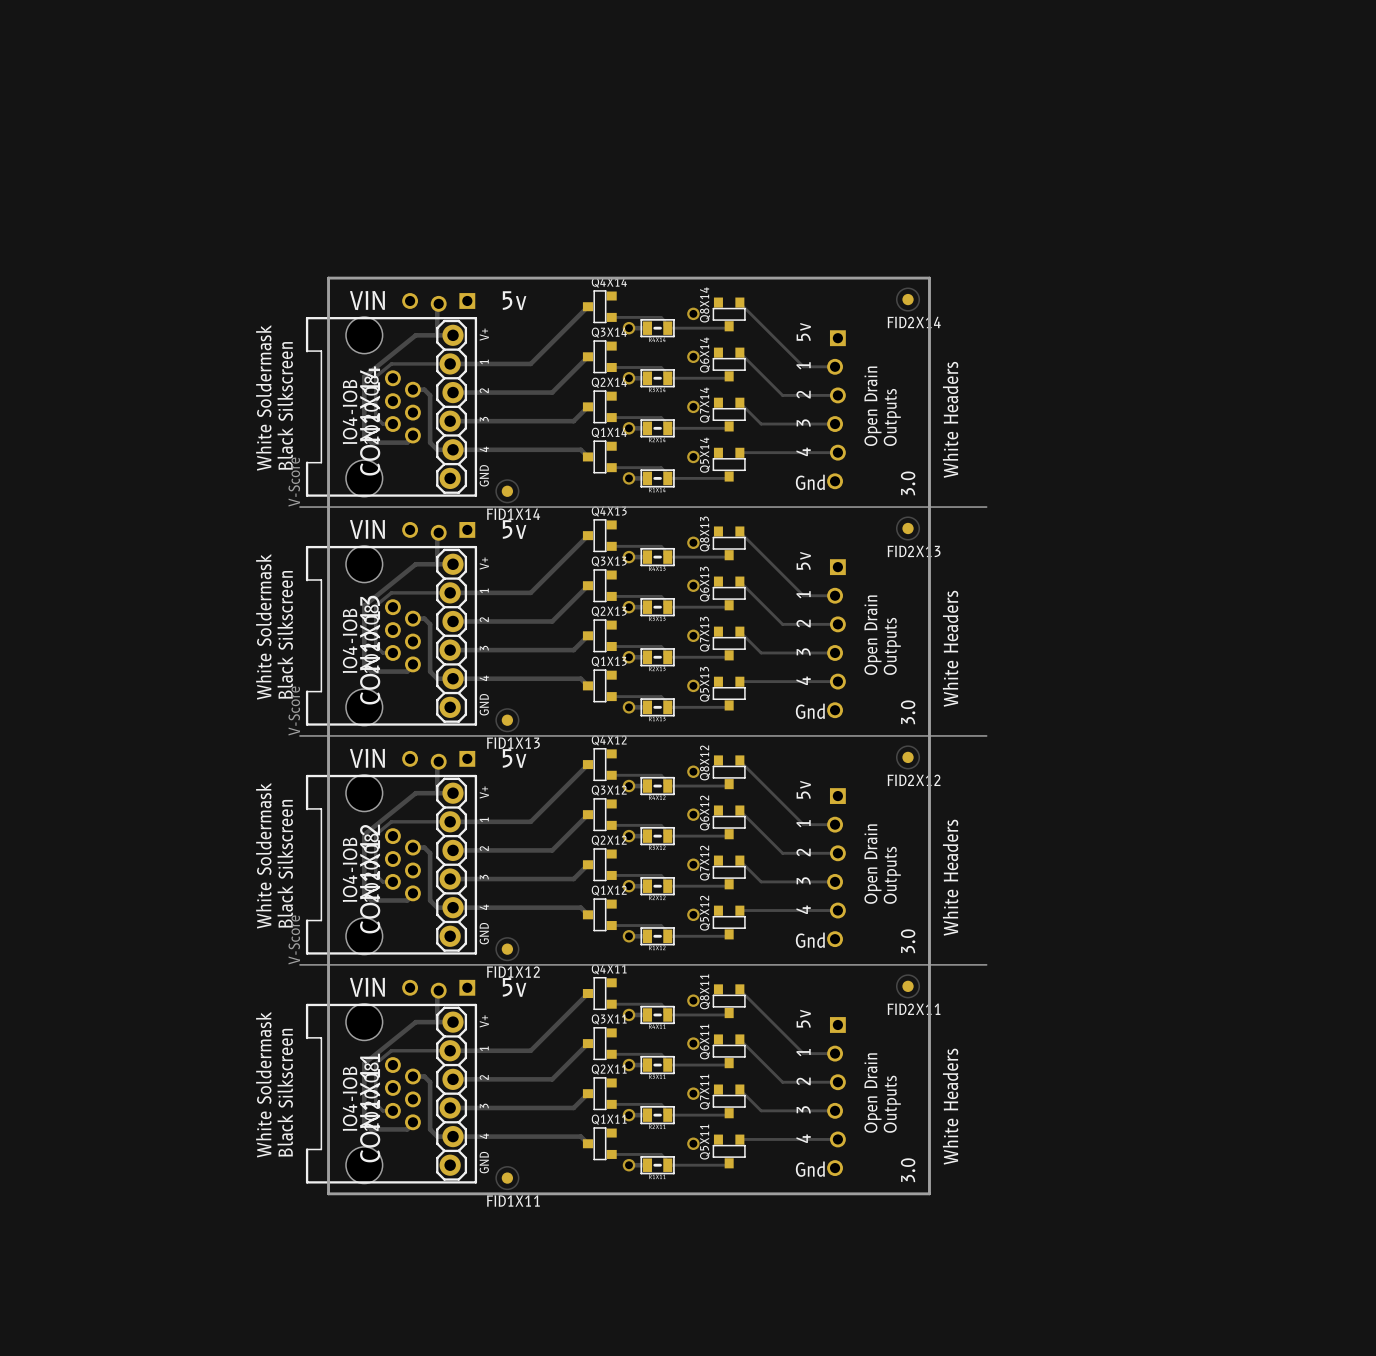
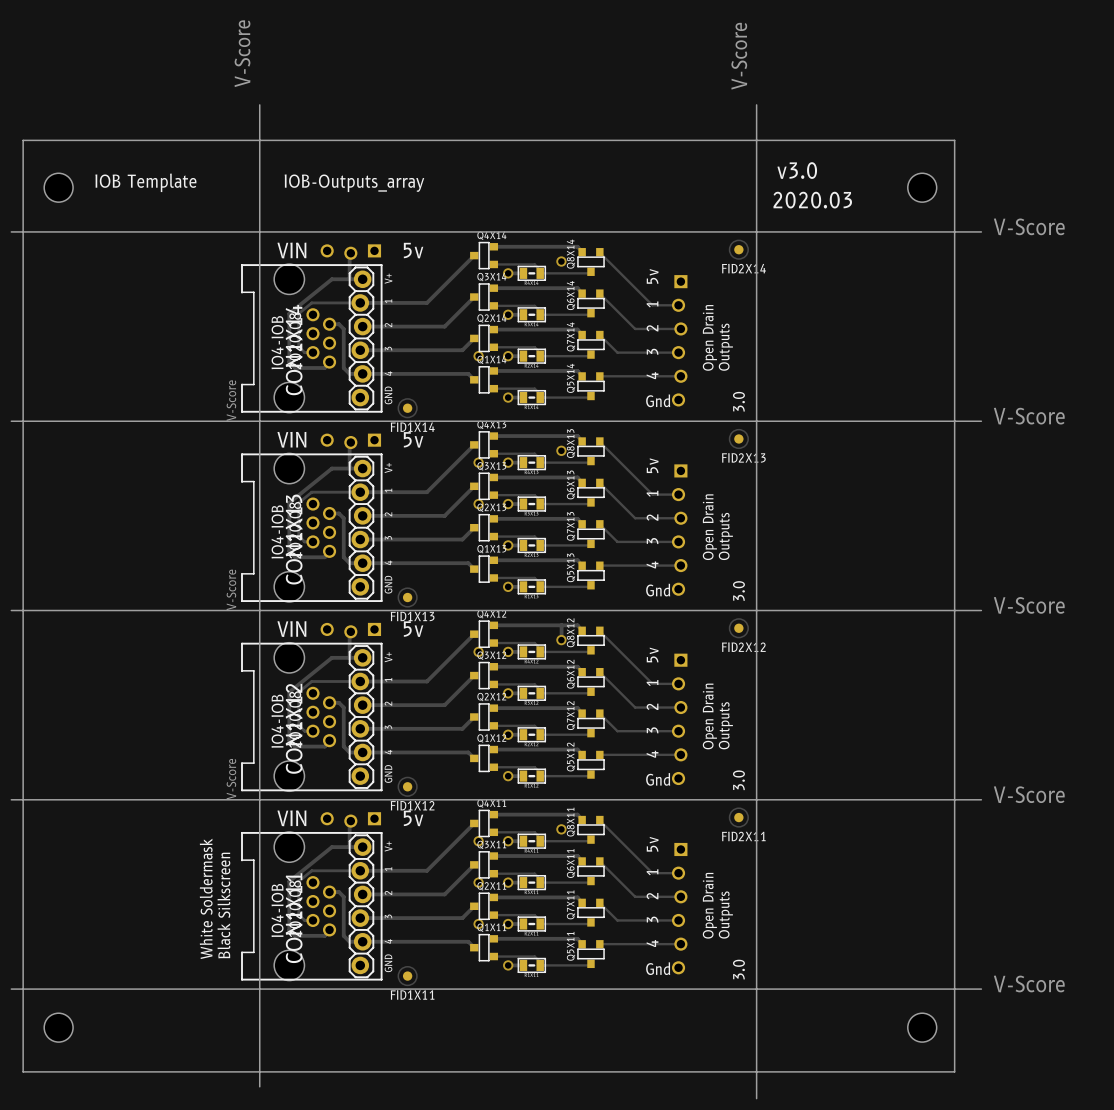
text: none -> v3.0 (797, 170)
text: none -> 2020.03 (812, 200)
board edge: (328, 278) (929, 278) -> none
board edge: (328, 278) (328, 1193) -> none
board edge: (929, 278) (929, 1193) -> none
track: none -> (493, 246) (577, 246) (582, 252)
track: none -> (493, 288) (577, 288) (582, 293)
via: (693, 356) -> none
track: none -> (493, 329) (577, 329) (582, 335)
text: White Soldermask (263, 397) -> none
text: Black Silkscreen (285, 405) -> none
via: (693, 406) -> none
text: White Headers (950, 419) -> none
via: none -> (478, 356)
track: none -> (493, 370) (577, 370) (582, 376)
via: (693, 456) -> none
board edge: (299, 507) (986, 507) -> none
track: none -> (493, 436) (577, 436) (582, 441)
via: none -> (478, 462)
track: none -> (493, 477) (577, 477) (582, 482)
via: (693, 585) -> none
via: none -> (478, 504)
track: none -> (493, 518) (577, 518) (582, 524)
text: White Soldermask (263, 626) -> none
text: Black Silkscreen (285, 634) -> none
via: (693, 635) -> none
text: White Headers (950, 648) -> none
track: none -> (493, 560) (577, 560) (582, 565)
via: (693, 685) -> none
part: none -> (496, 601)
board edge: (299, 735) (986, 735) -> none
track: none -> (493, 625) (577, 625) (582, 630)
track: none -> (561, 625) (561, 640)
via: none -> (478, 651)
track: none -> (493, 666) (577, 666) (582, 672)
via: (693, 814) -> none
track: none -> (493, 708) (577, 708) (582, 713)
text: White Soldermask (263, 855) -> none
text: Black Silkscreen (285, 863) -> none
via: (693, 864) -> none
text: White Headers (950, 877) -> none
track: none -> (493, 749) (577, 749) (582, 754)
via: (693, 914) -> none
board edge: (299, 964) (986, 964) -> none
track: none -> (493, 814) (577, 814) (582, 820)
via: none -> (478, 841)
track: none -> (493, 856) (577, 856) (582, 861)
via: (693, 1043) -> none
via: none -> (478, 882)
track: none -> (493, 897) (577, 897) (582, 902)
via: (693, 1093) -> none
text: White Headers (950, 1106) -> none
via: none -> (478, 924)
track: none -> (493, 938) (577, 938) (582, 944)
via: (693, 1143) -> none
board edge: (328, 1193) (929, 1193) -> none

